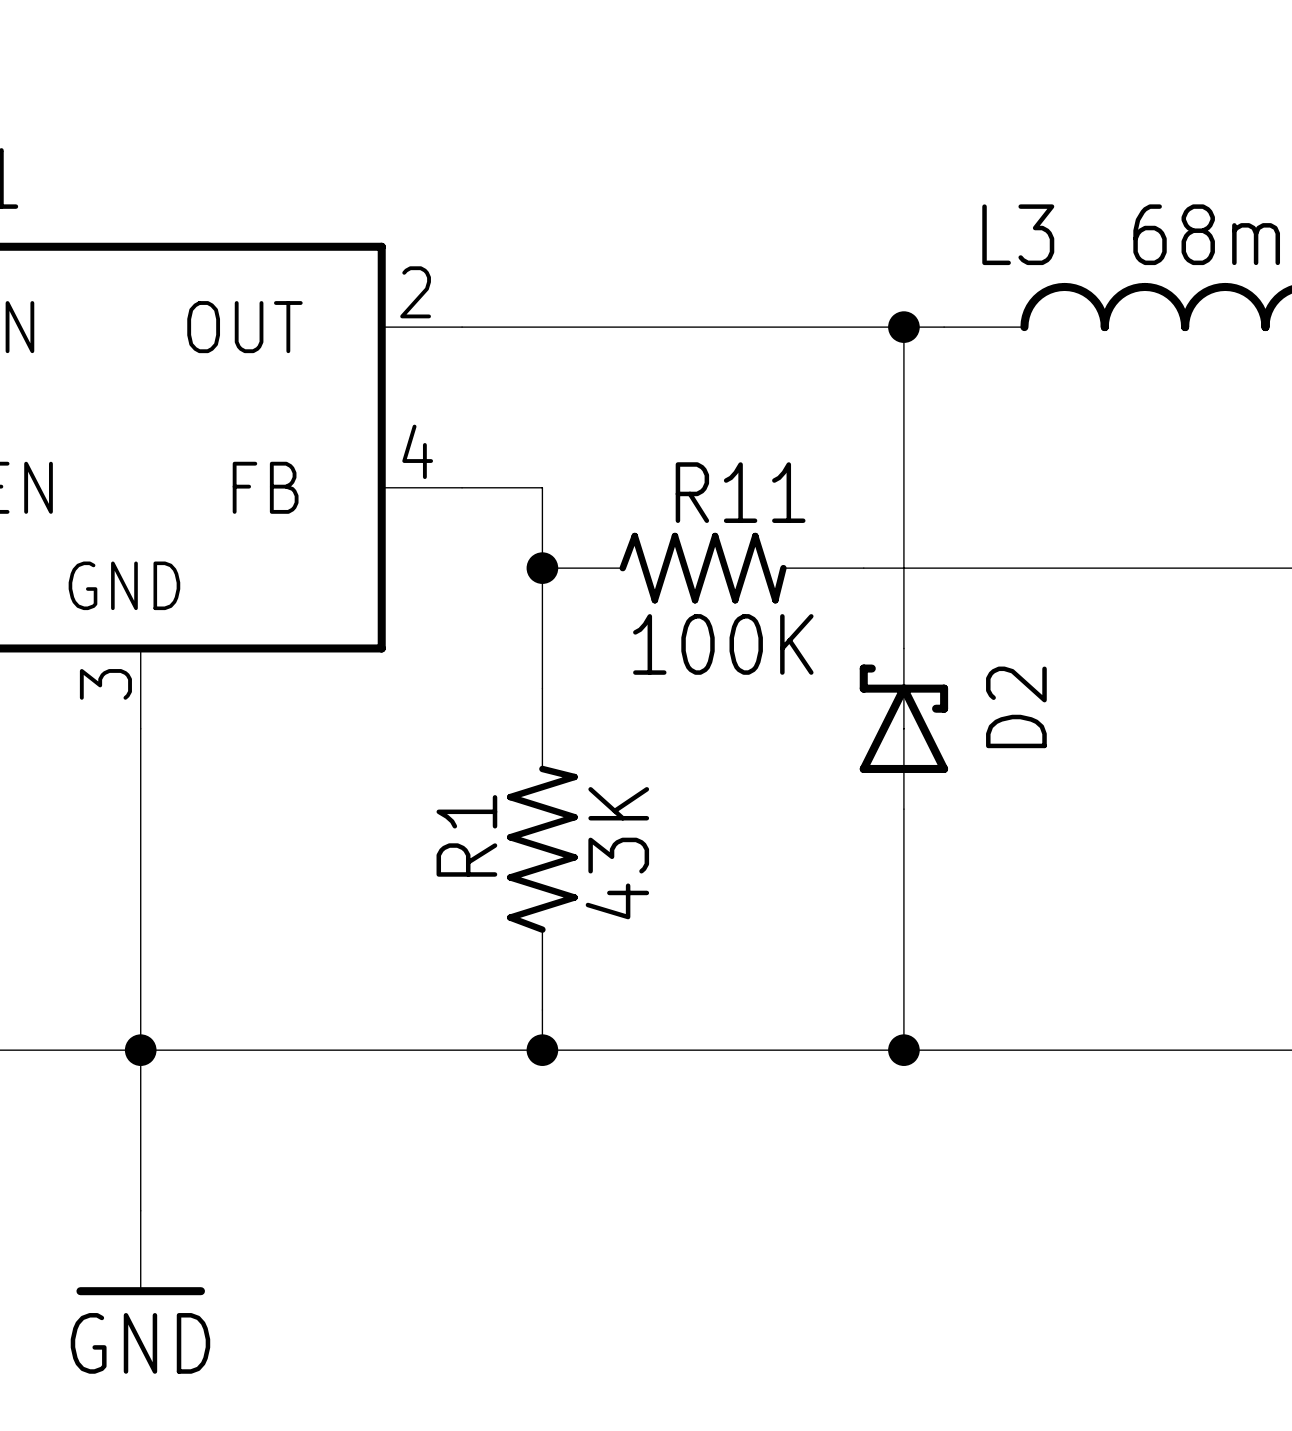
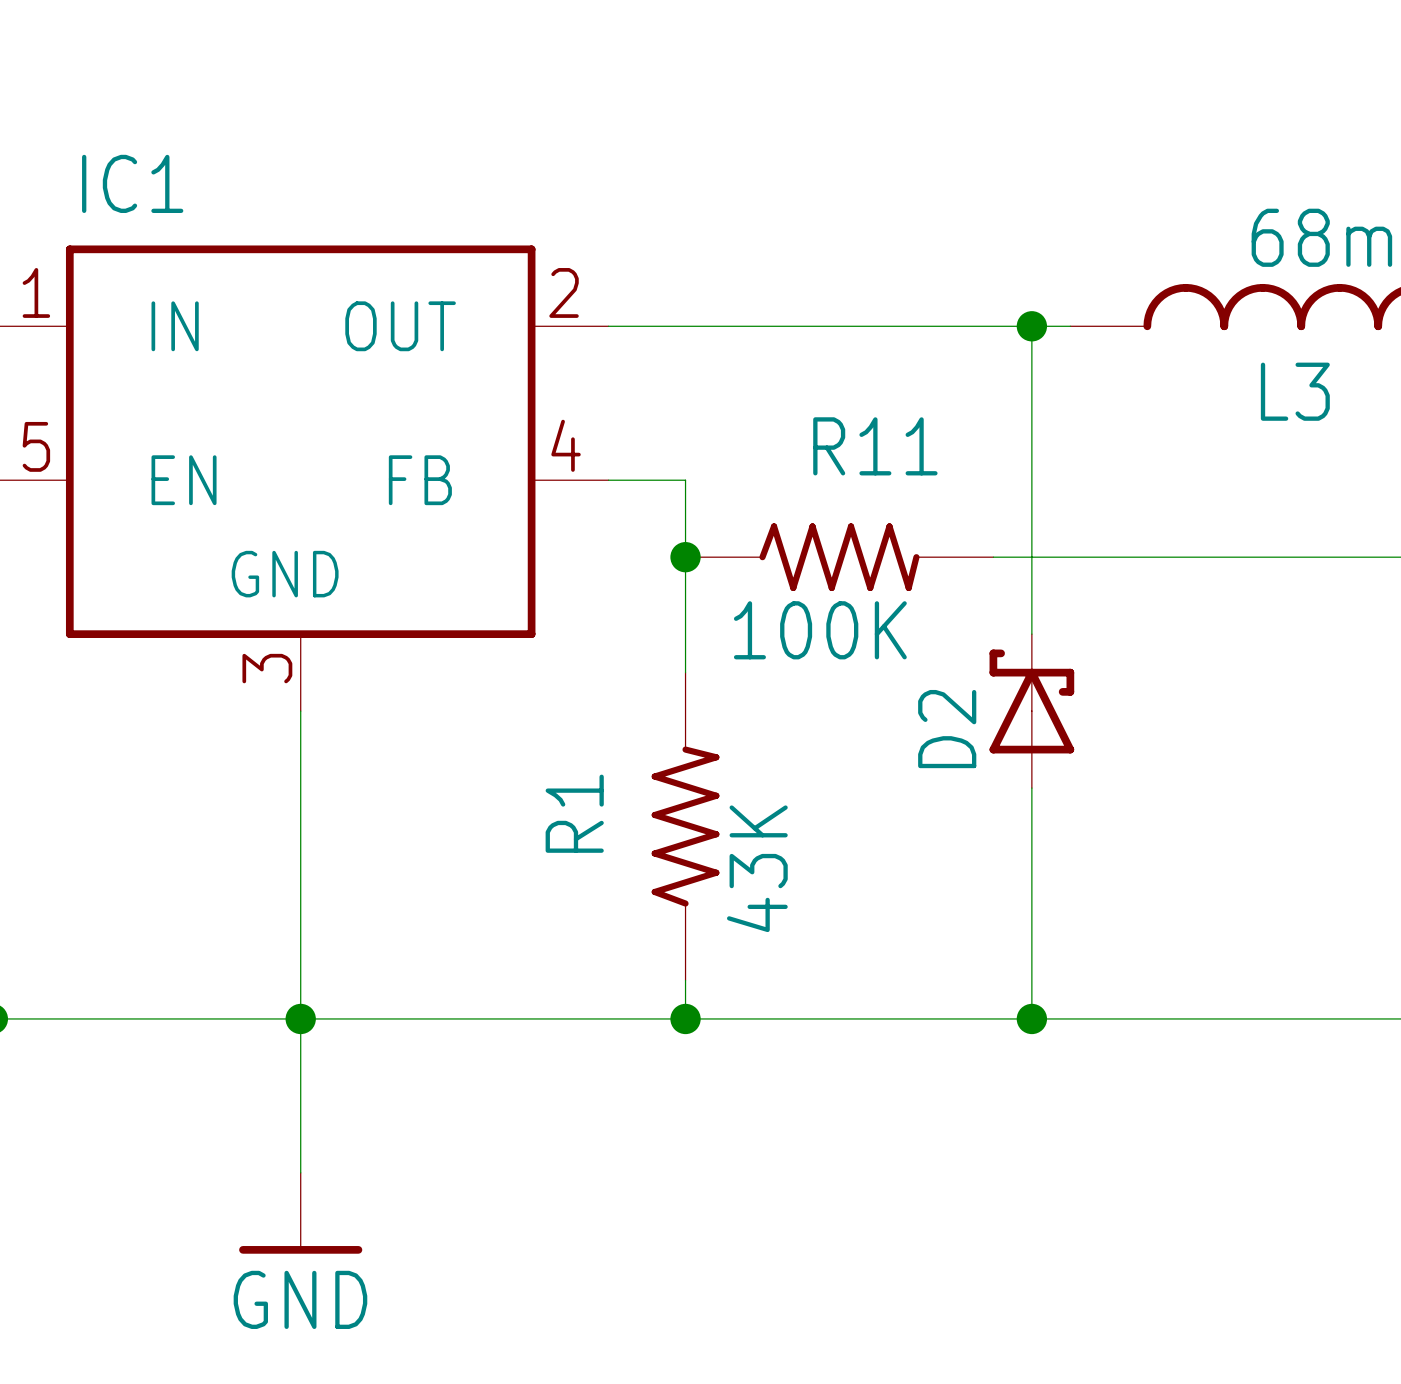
L3 name position: L3 (1018, 234) -> L3 (1295, 391)
R11 name position: R11 (740, 492) -> R11 (875, 446)
R11 value position: 100K (723, 644) -> 100K (820, 630)
D2 name position: D2 (1016, 707) -> D2 (947, 729)
R1 name position: R1 (466, 835) -> R1 (574, 813)
R1 value position: 43K (617, 853) -> 43K (757, 868)

